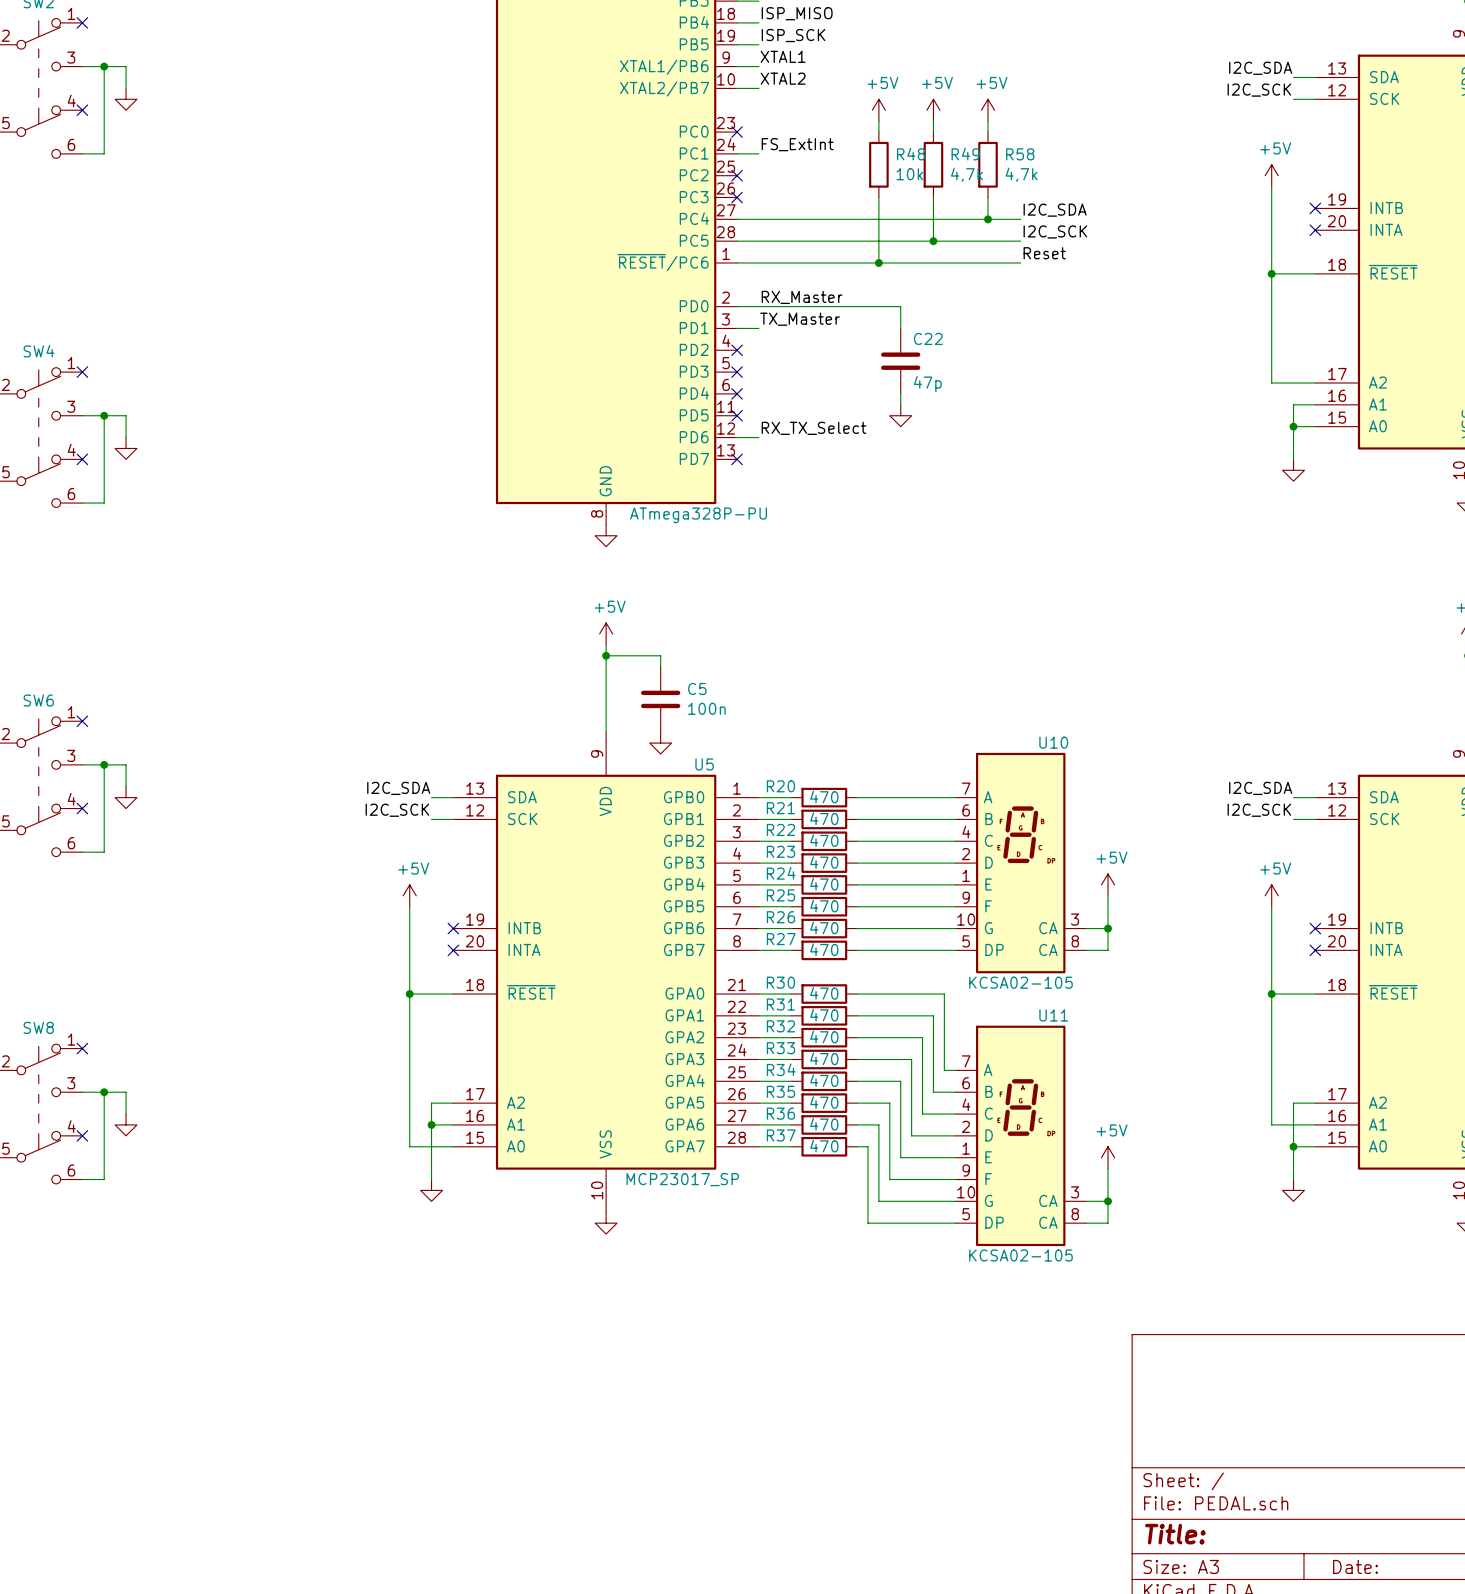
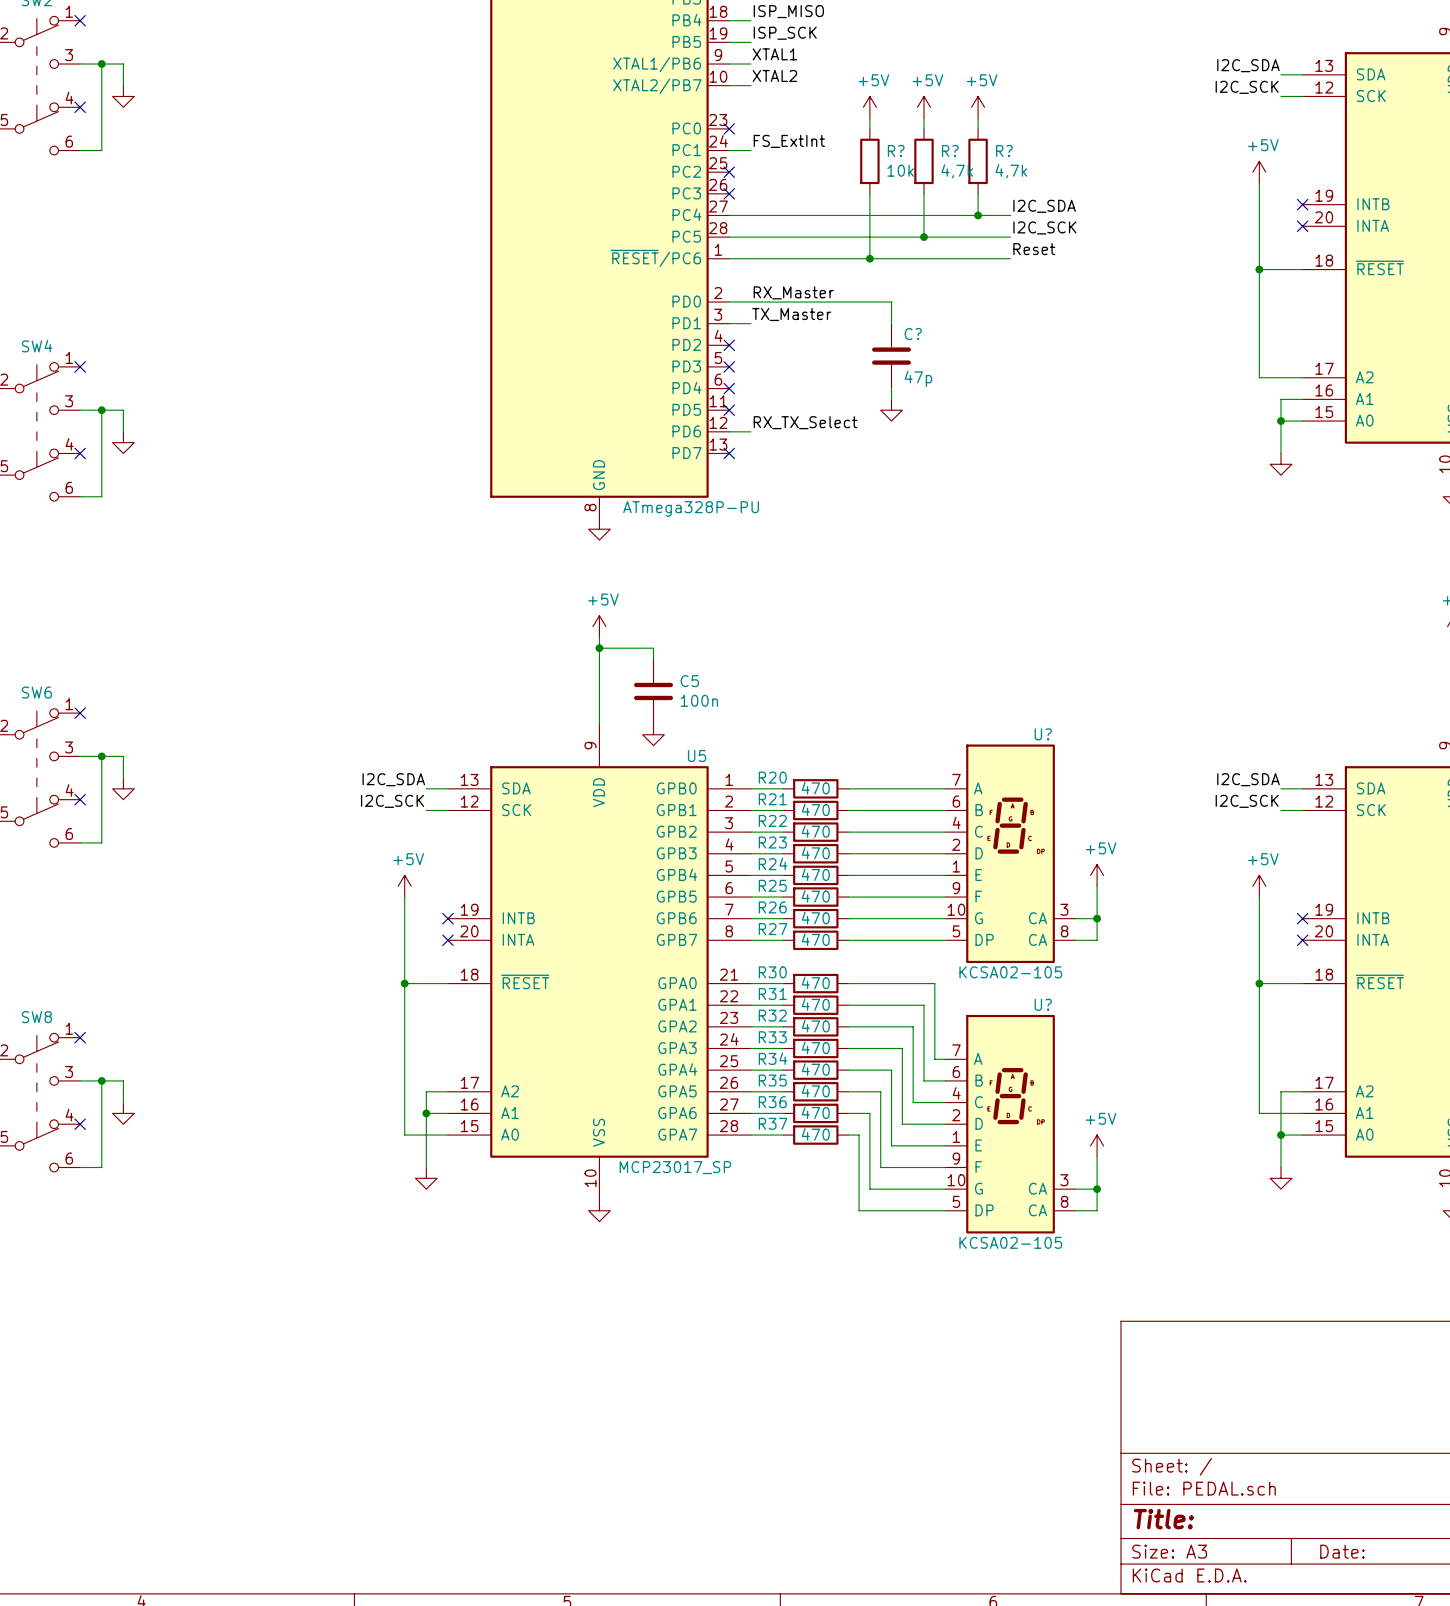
R48 name: R48 (911, 154) -> R? (896, 151)
R49 name: R49 (965, 154) -> R? (950, 151)
R58 name: R58 (1020, 154) -> R? (1004, 151)
C22 name: C22 (928, 338) -> C? (913, 334)
U10 name: U10 (1053, 742) -> U? (1043, 734)
U11 name: U11 (1053, 1015) -> U? (1043, 1004)

